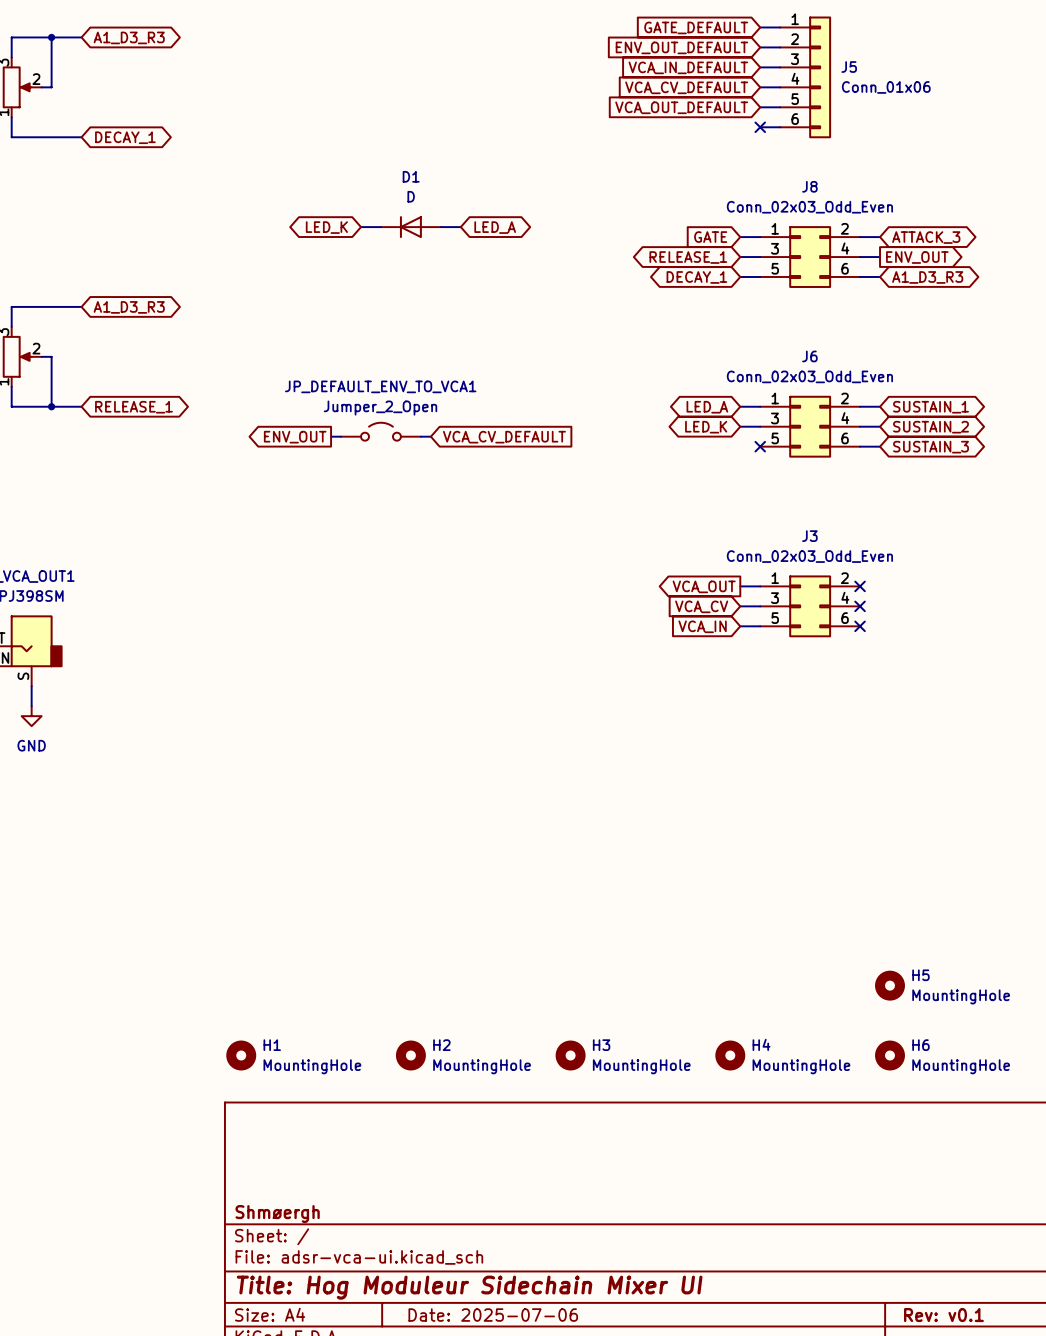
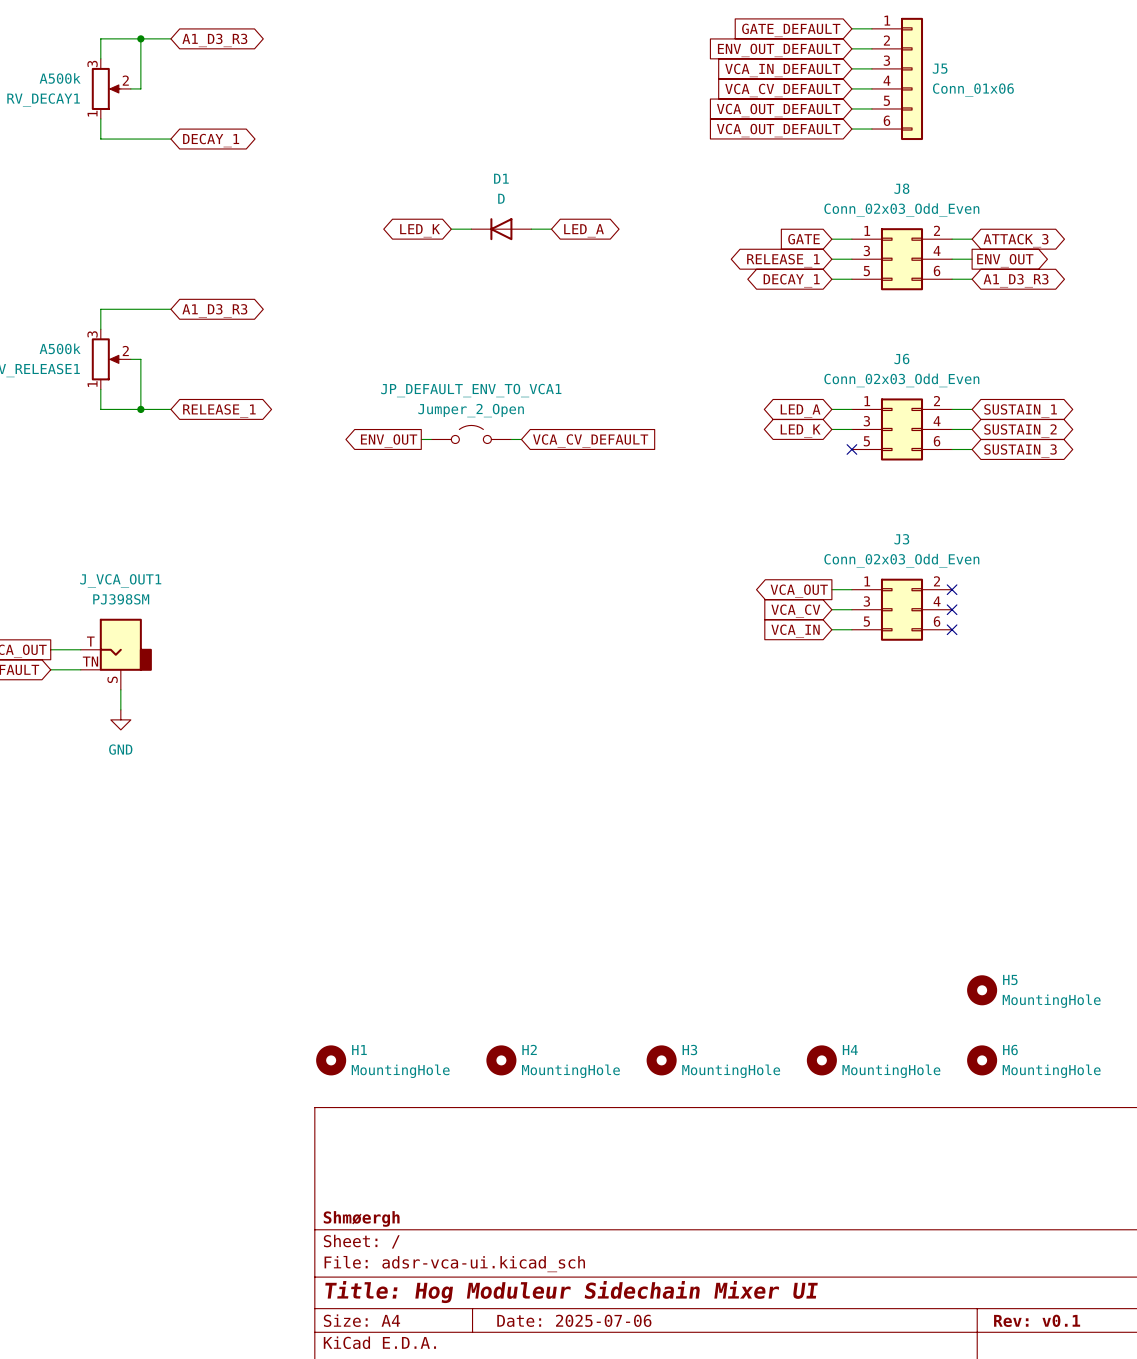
global label: none -> VCA_OUT_DEFAULT (778, 130)
no-connect mark: (760, 127) -> none

